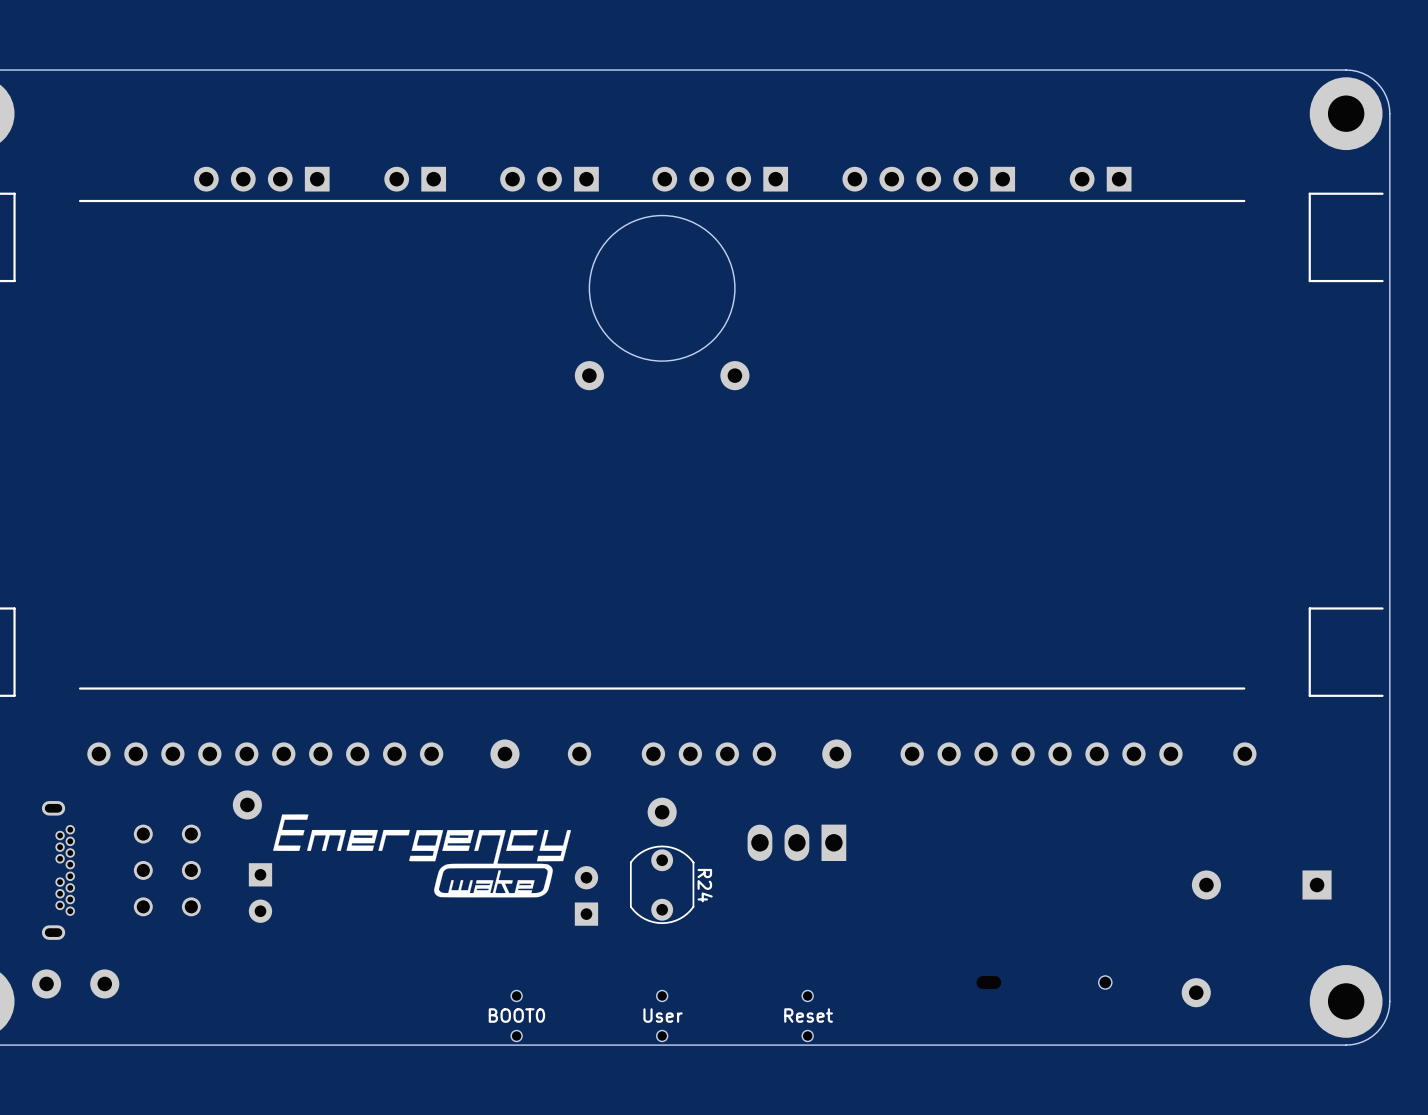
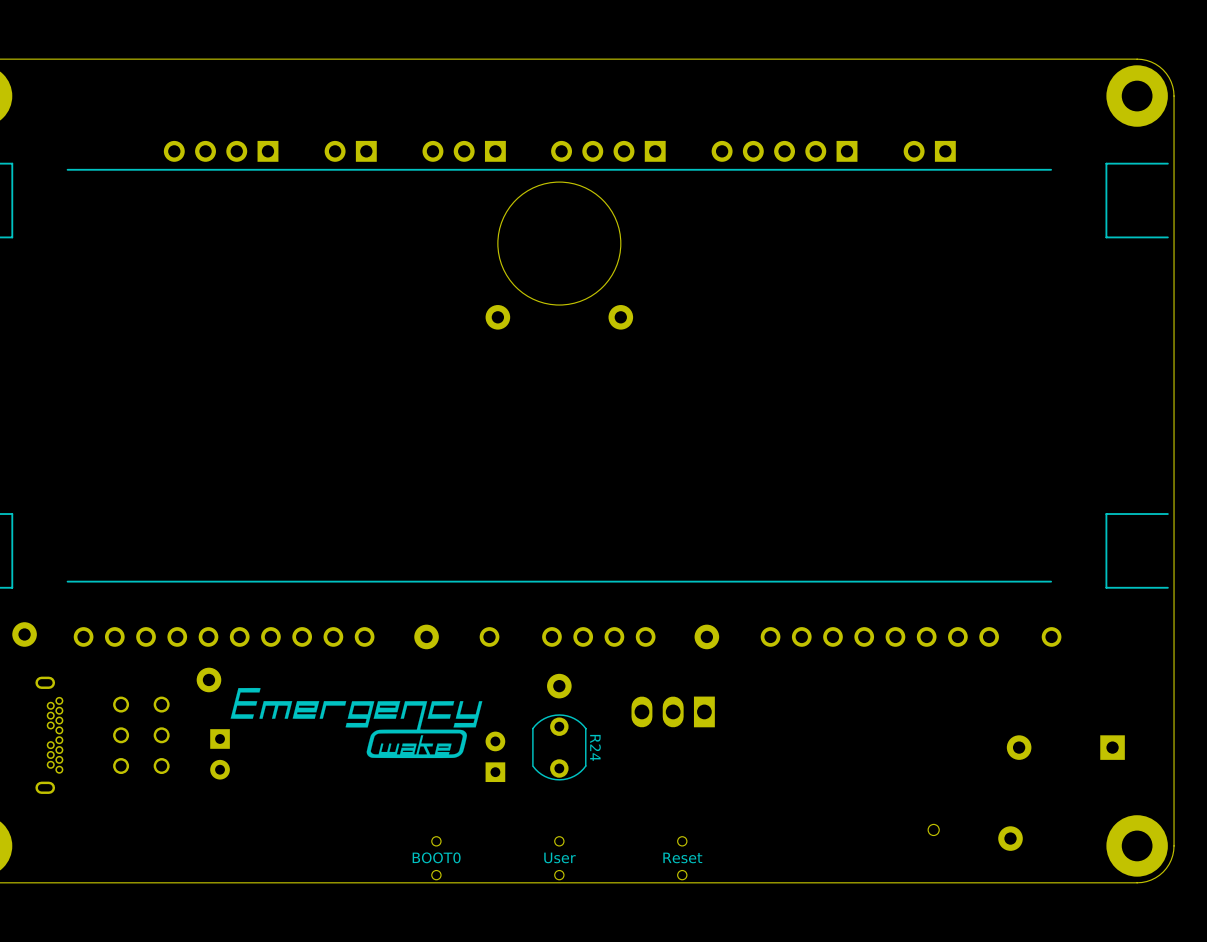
part: none -> (24, 634)
part: (46, 983) -> none
part: (104, 983) -> none

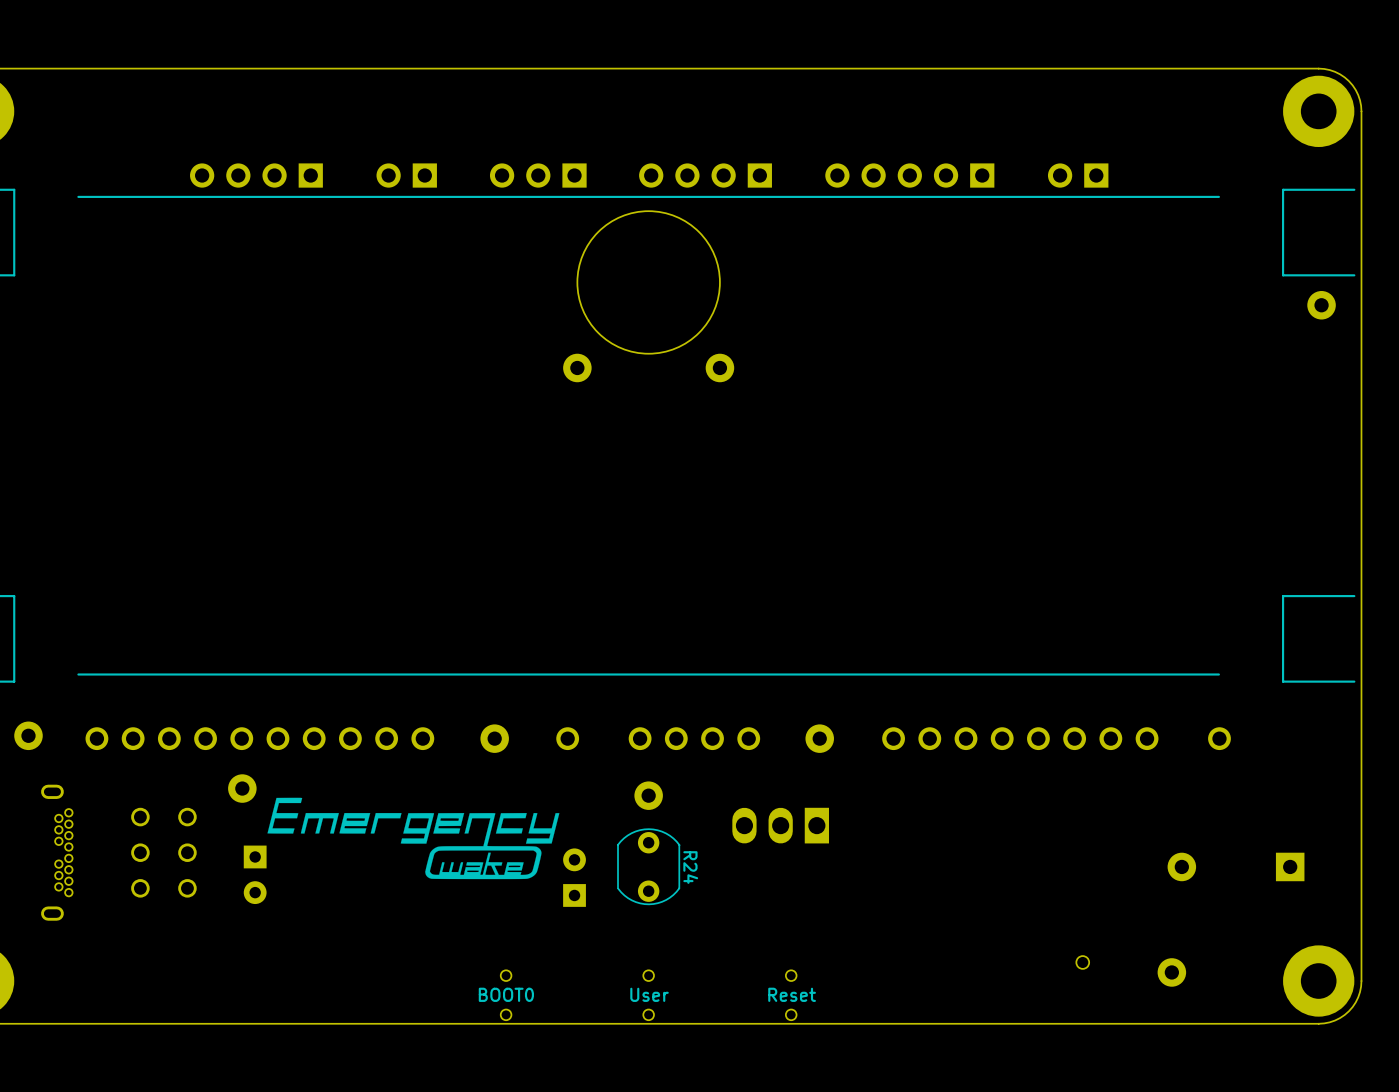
part: none -> (1321, 305)

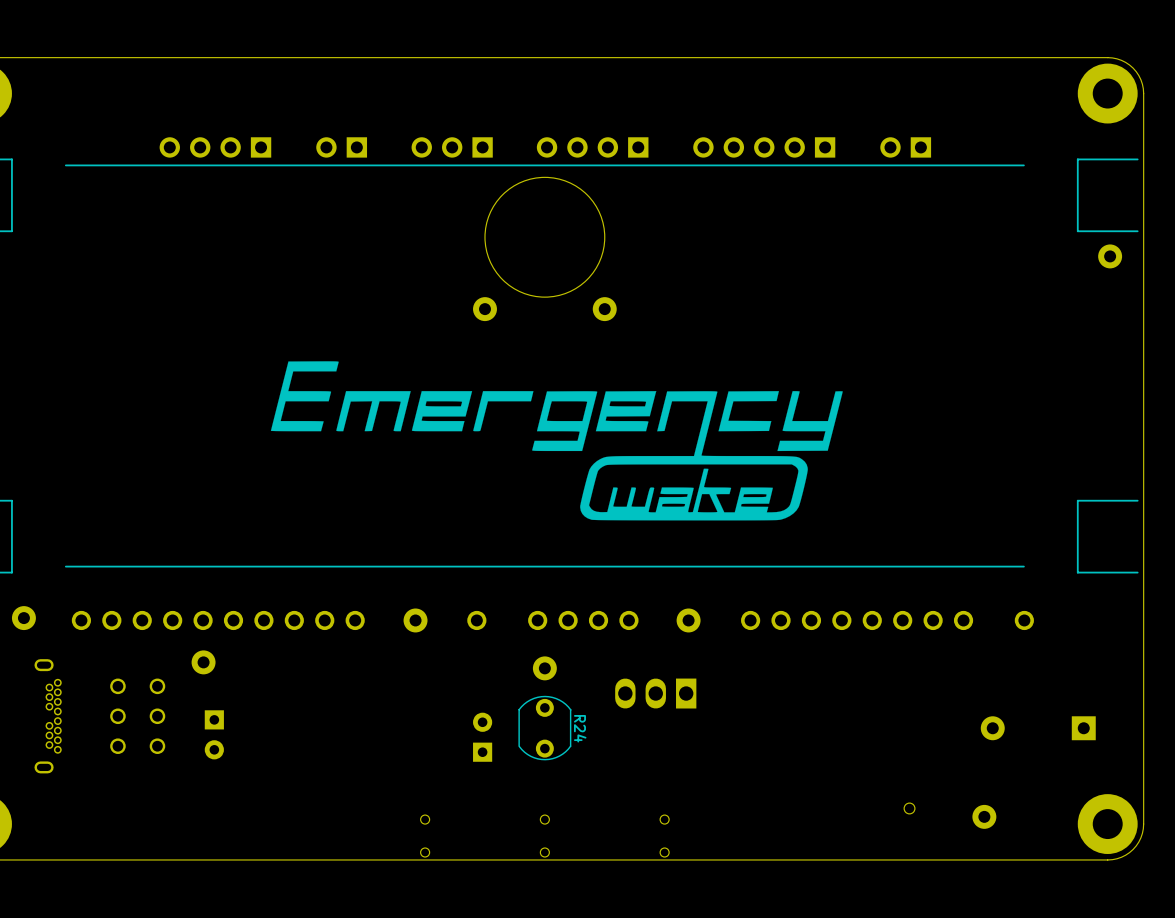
drawing: none -> [270, 361, 843, 521]
drawing: [267, 797, 560, 880] -> none
text: BOOT0 (506, 994) -> none
text: User (649, 994) -> none
text: Reset (792, 994) -> none

